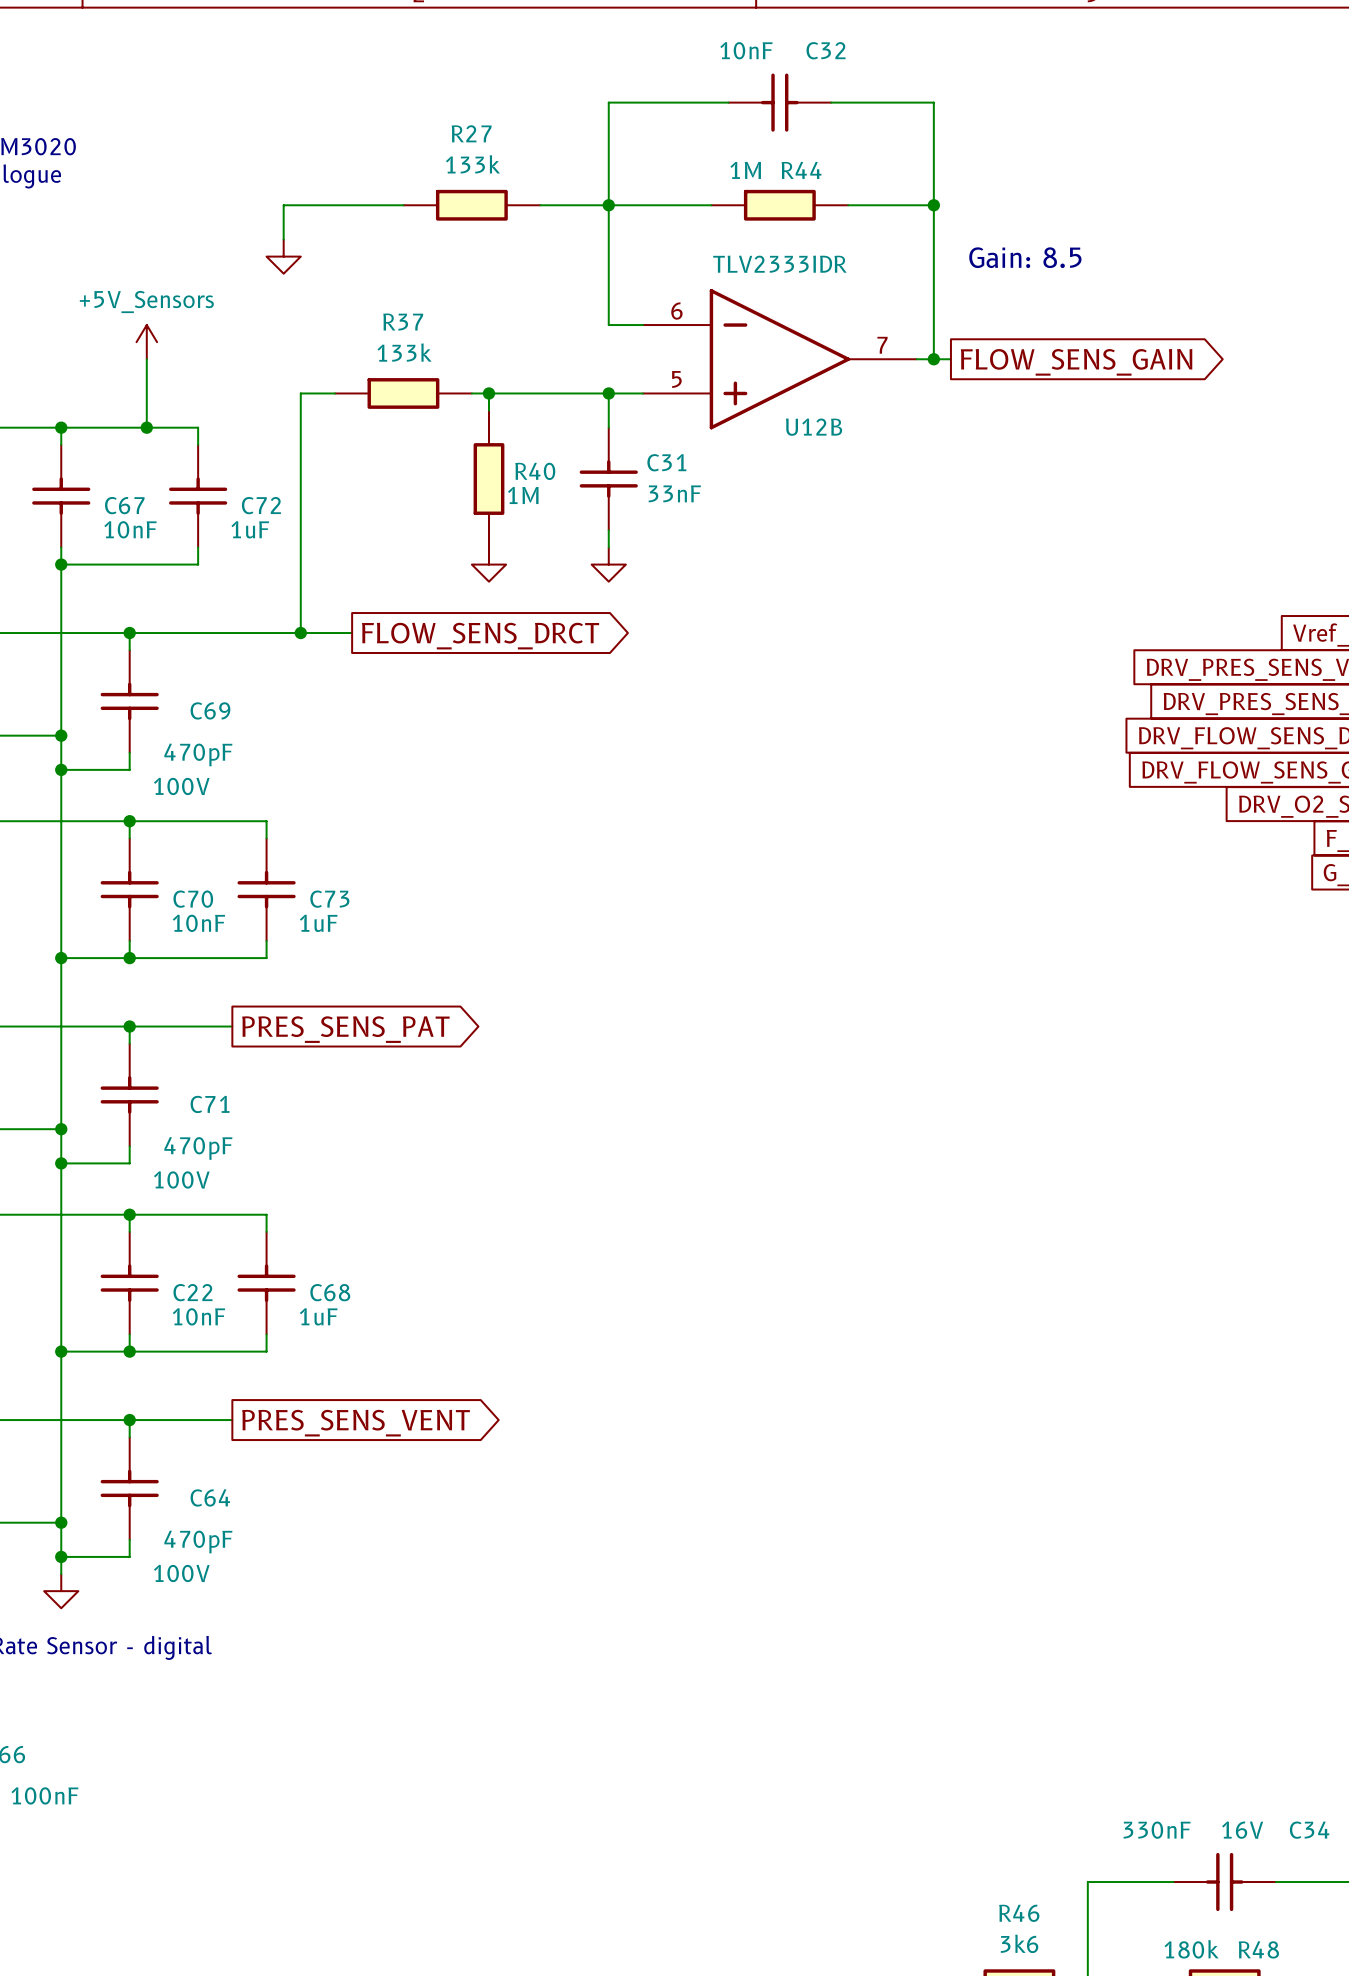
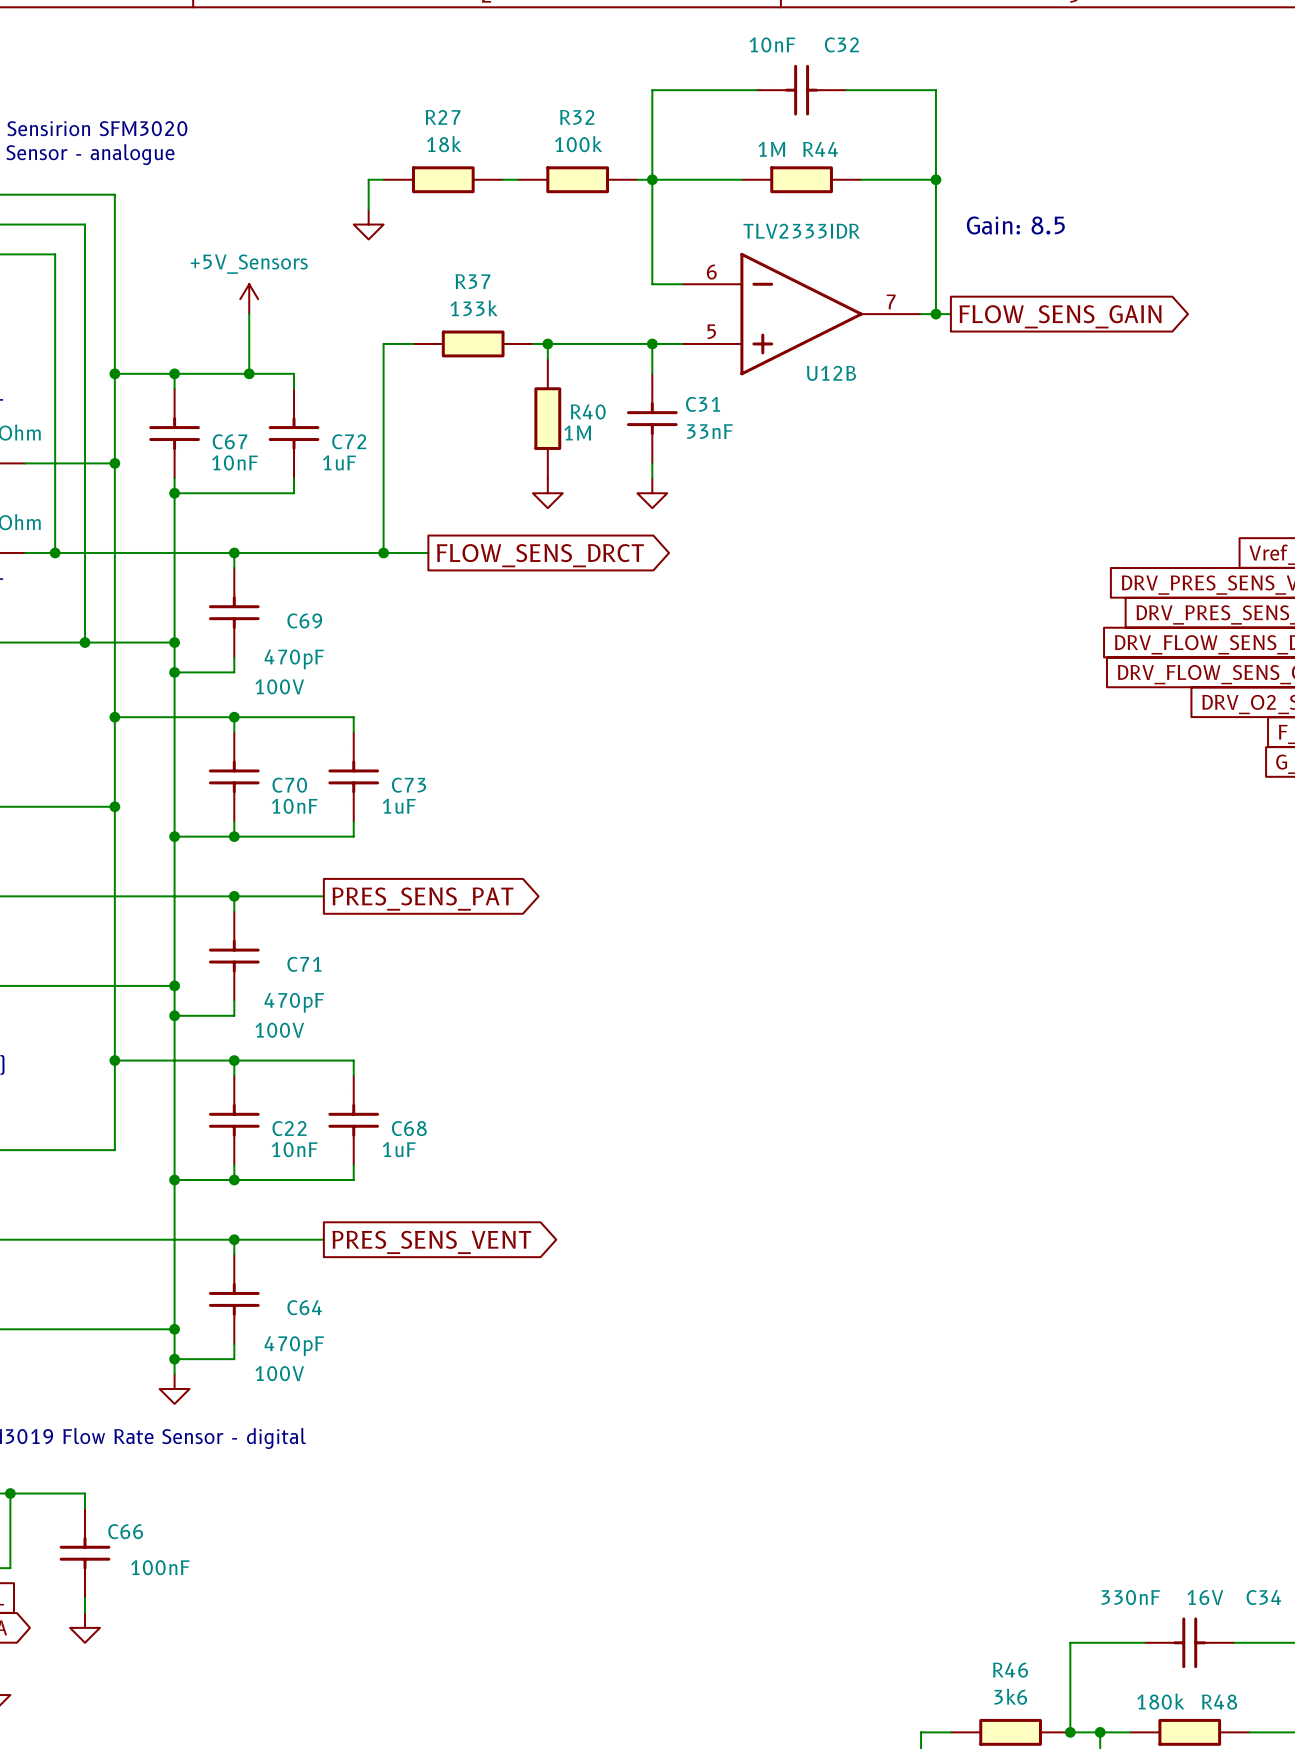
R27 text: 133k (472, 164) -> 18k (444, 144)
R27 position: (471, 205) -> (443, 179)
R32: none -> (577, 179)

